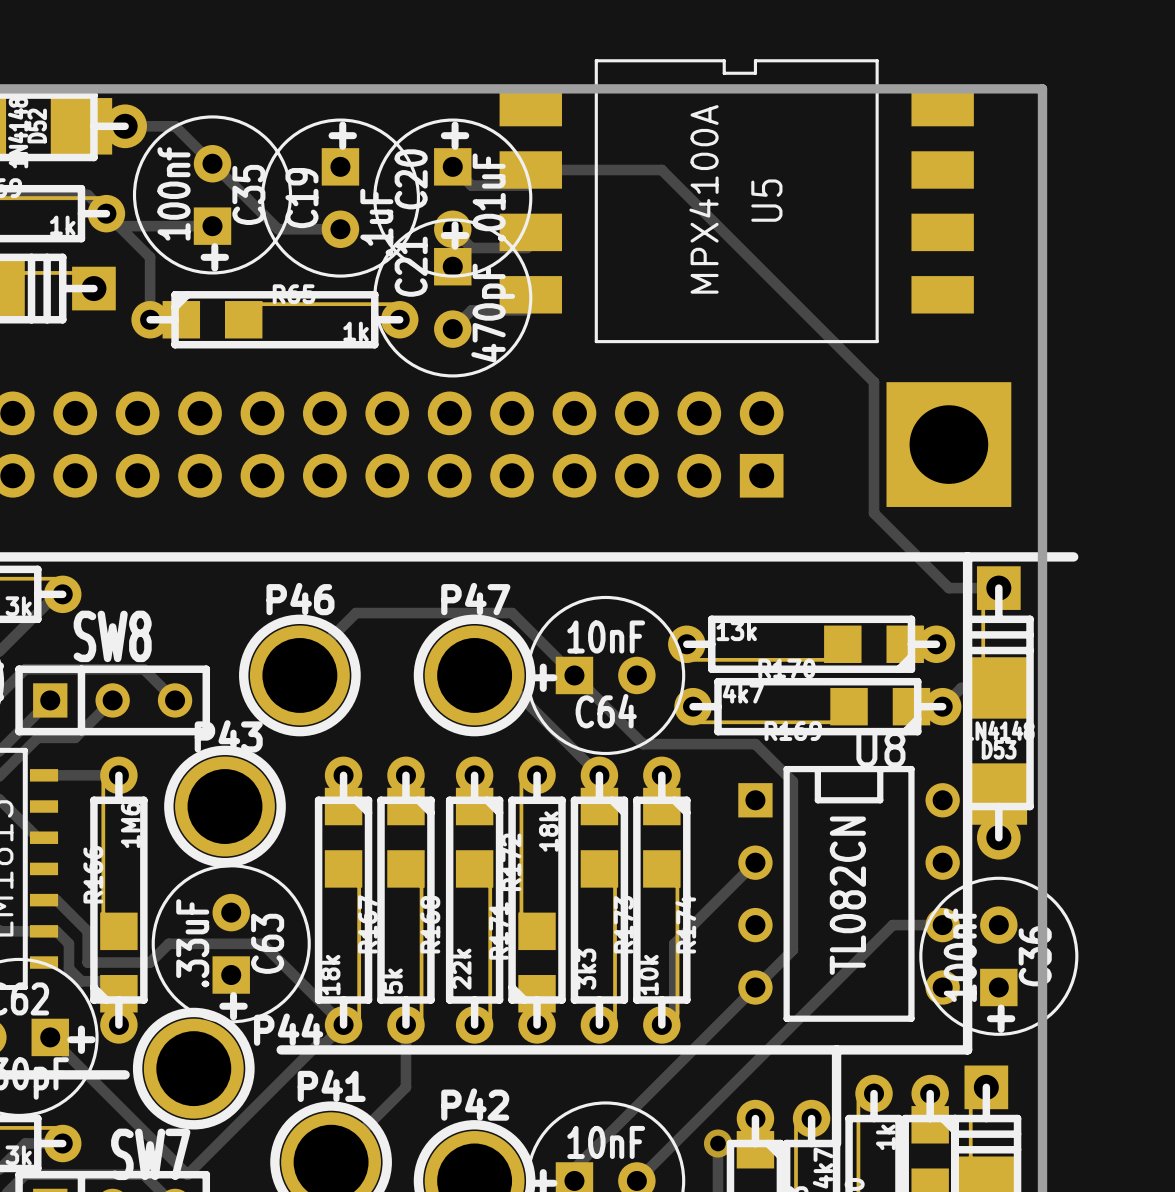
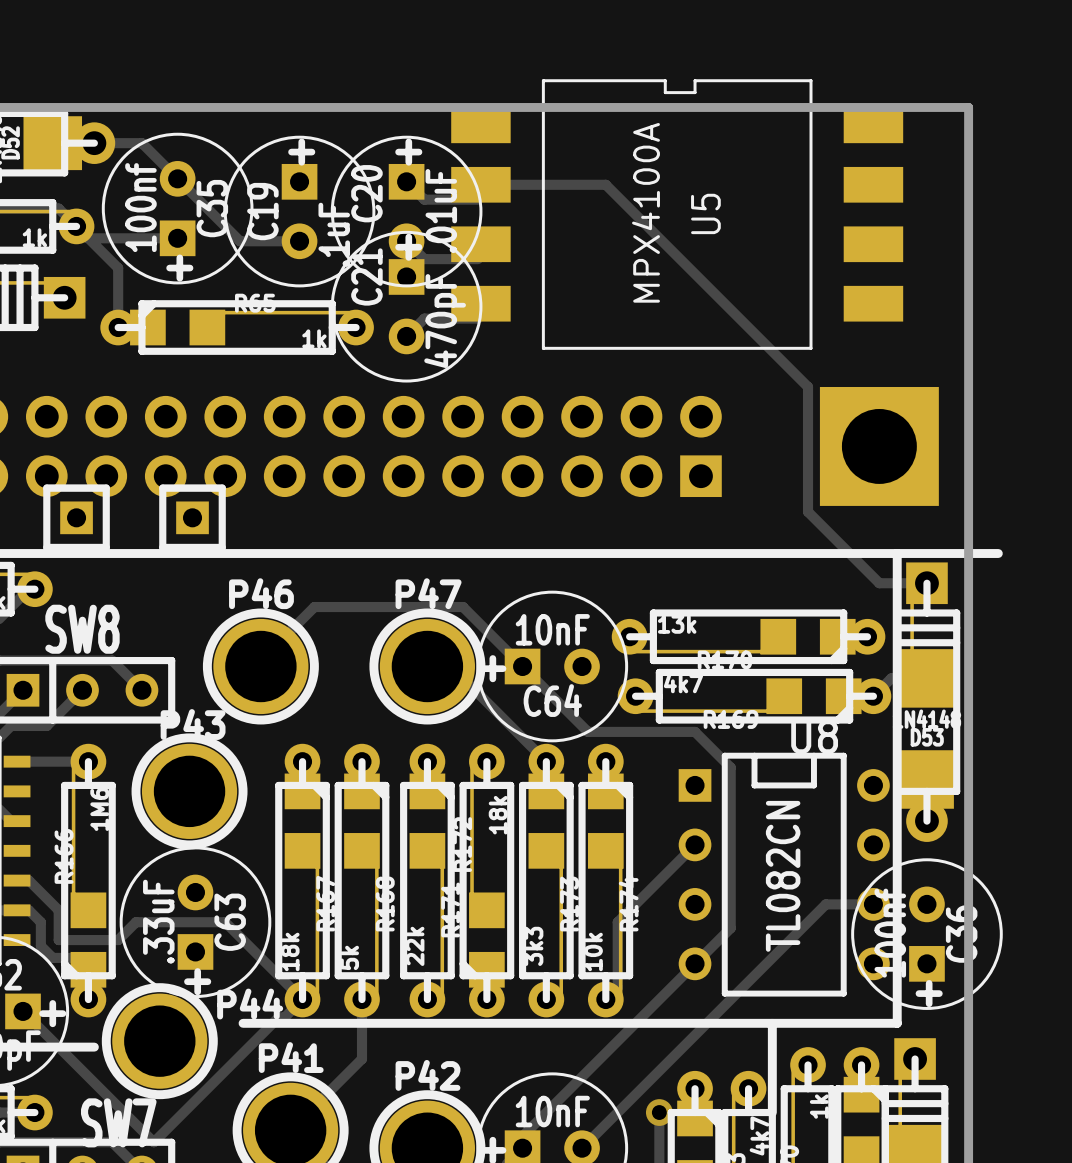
part: none -> (76, 517)
part: none -> (192, 517)

